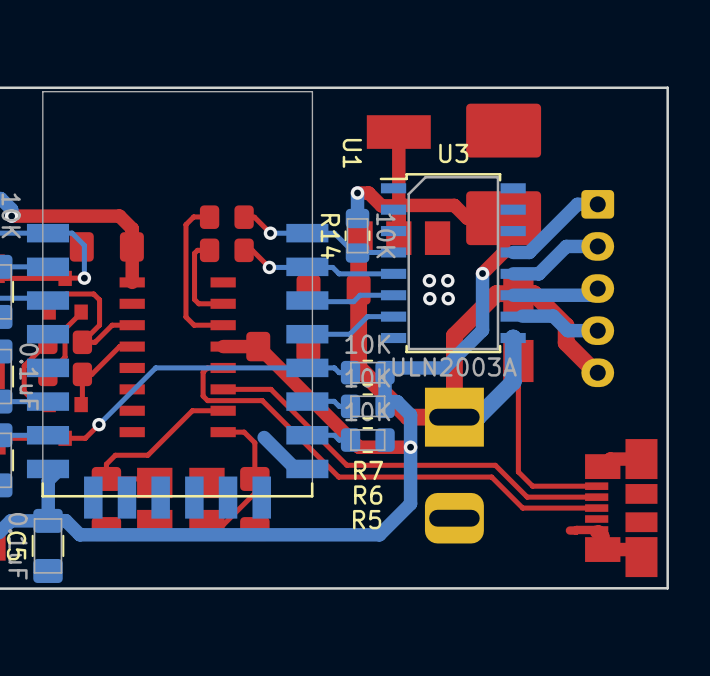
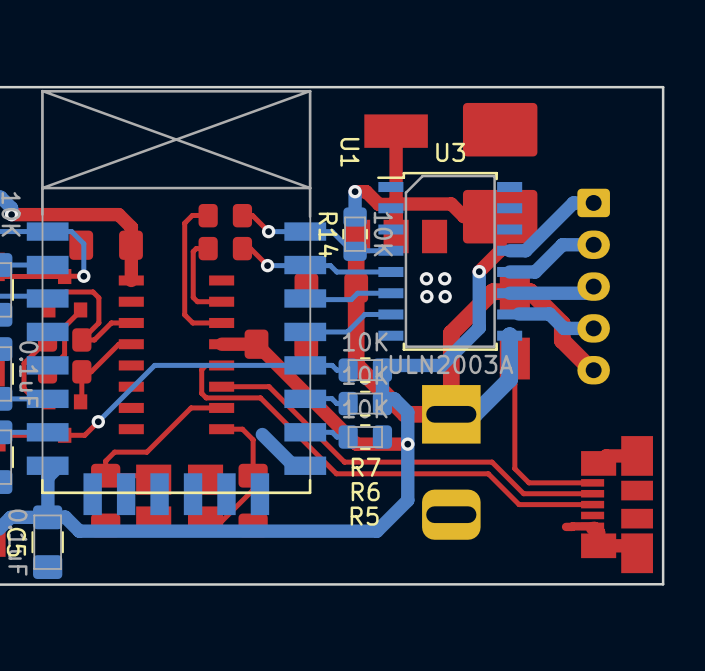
U1 footprint: [26, 91, 329, 519] -> [26, 89, 327, 516]

